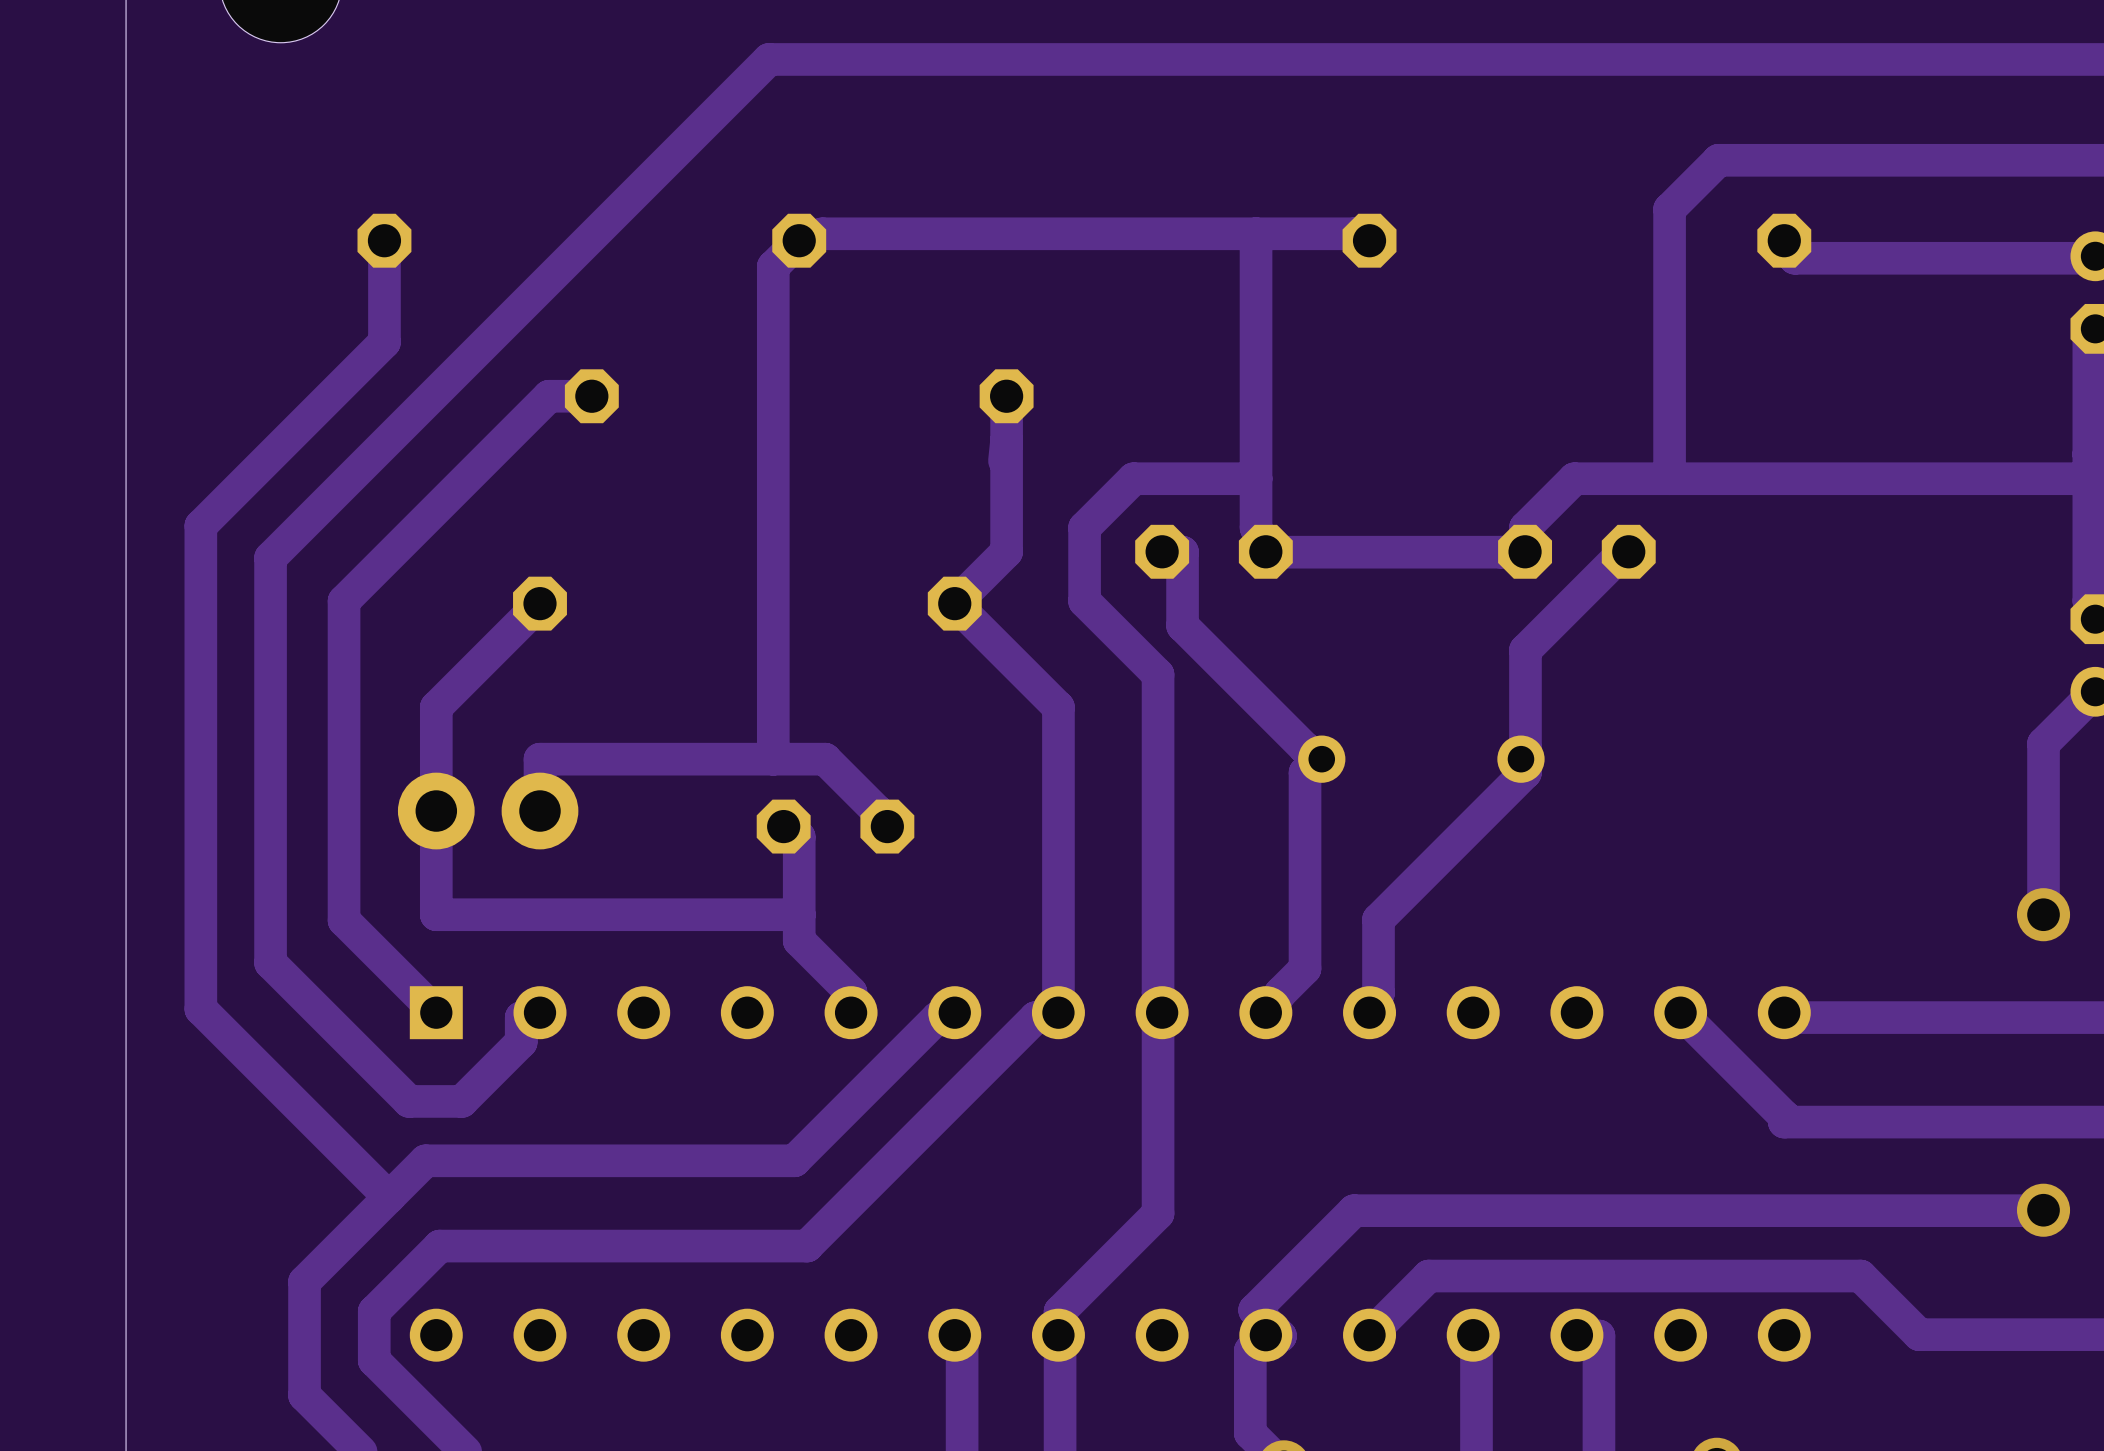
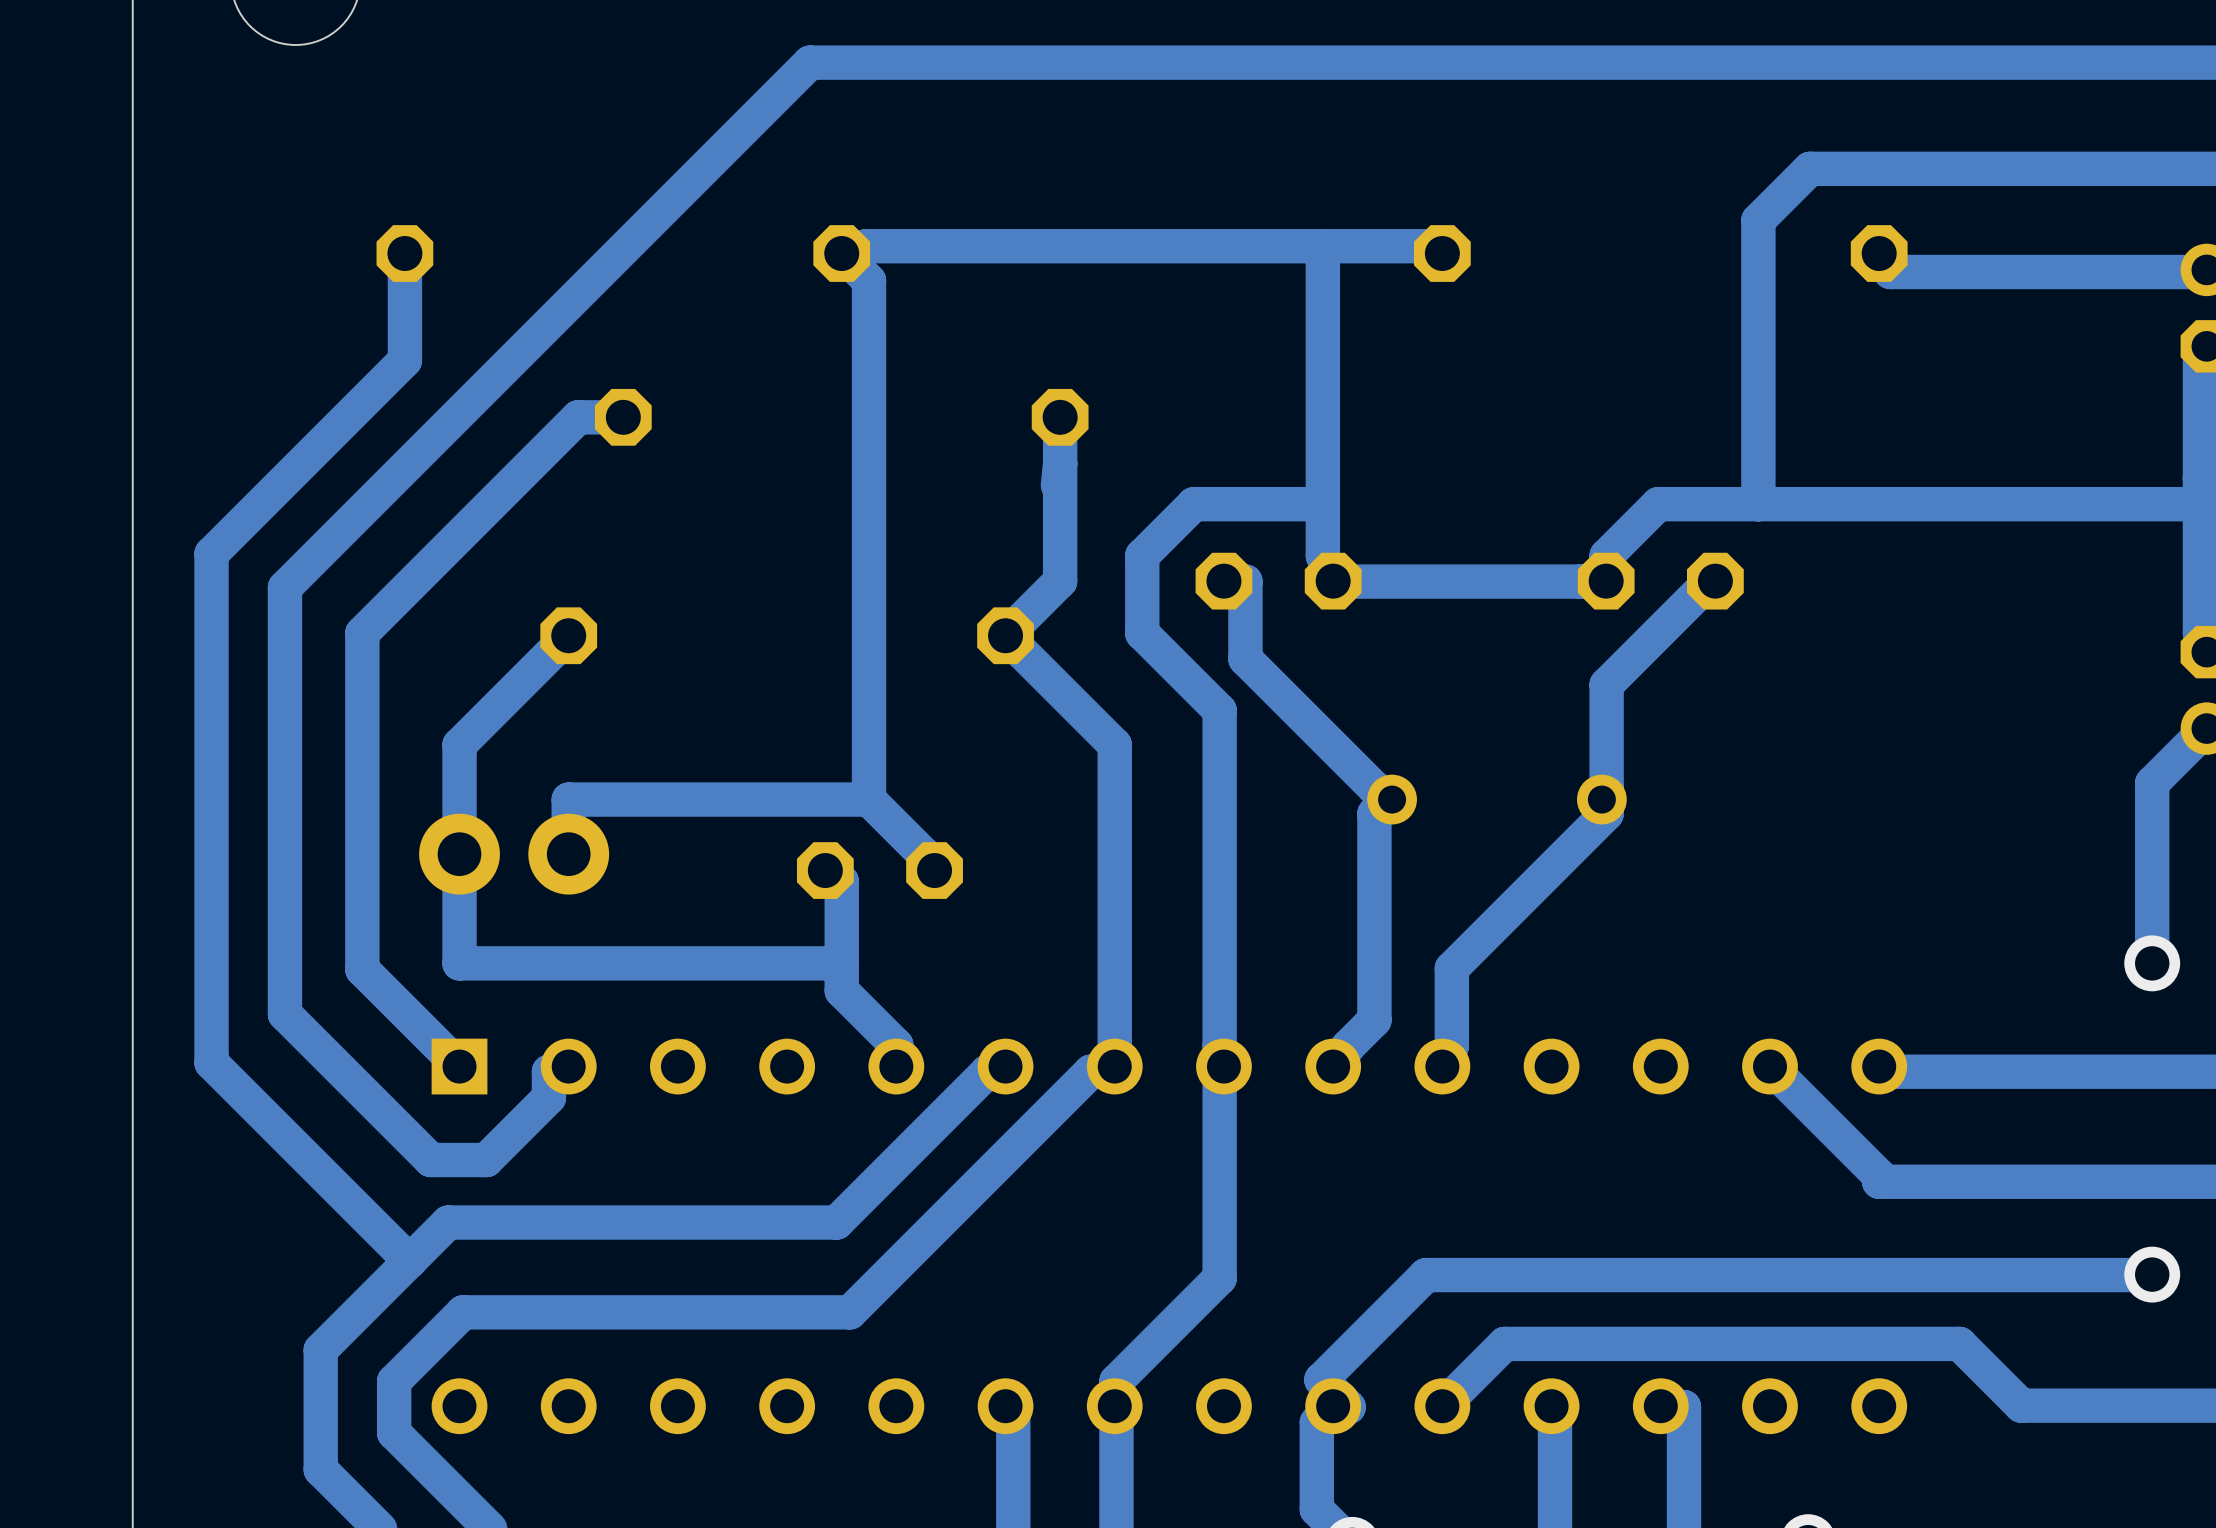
track: (799, 240) (773, 266) (773, 759) -> (841, 253) (869, 280) (869, 799)

